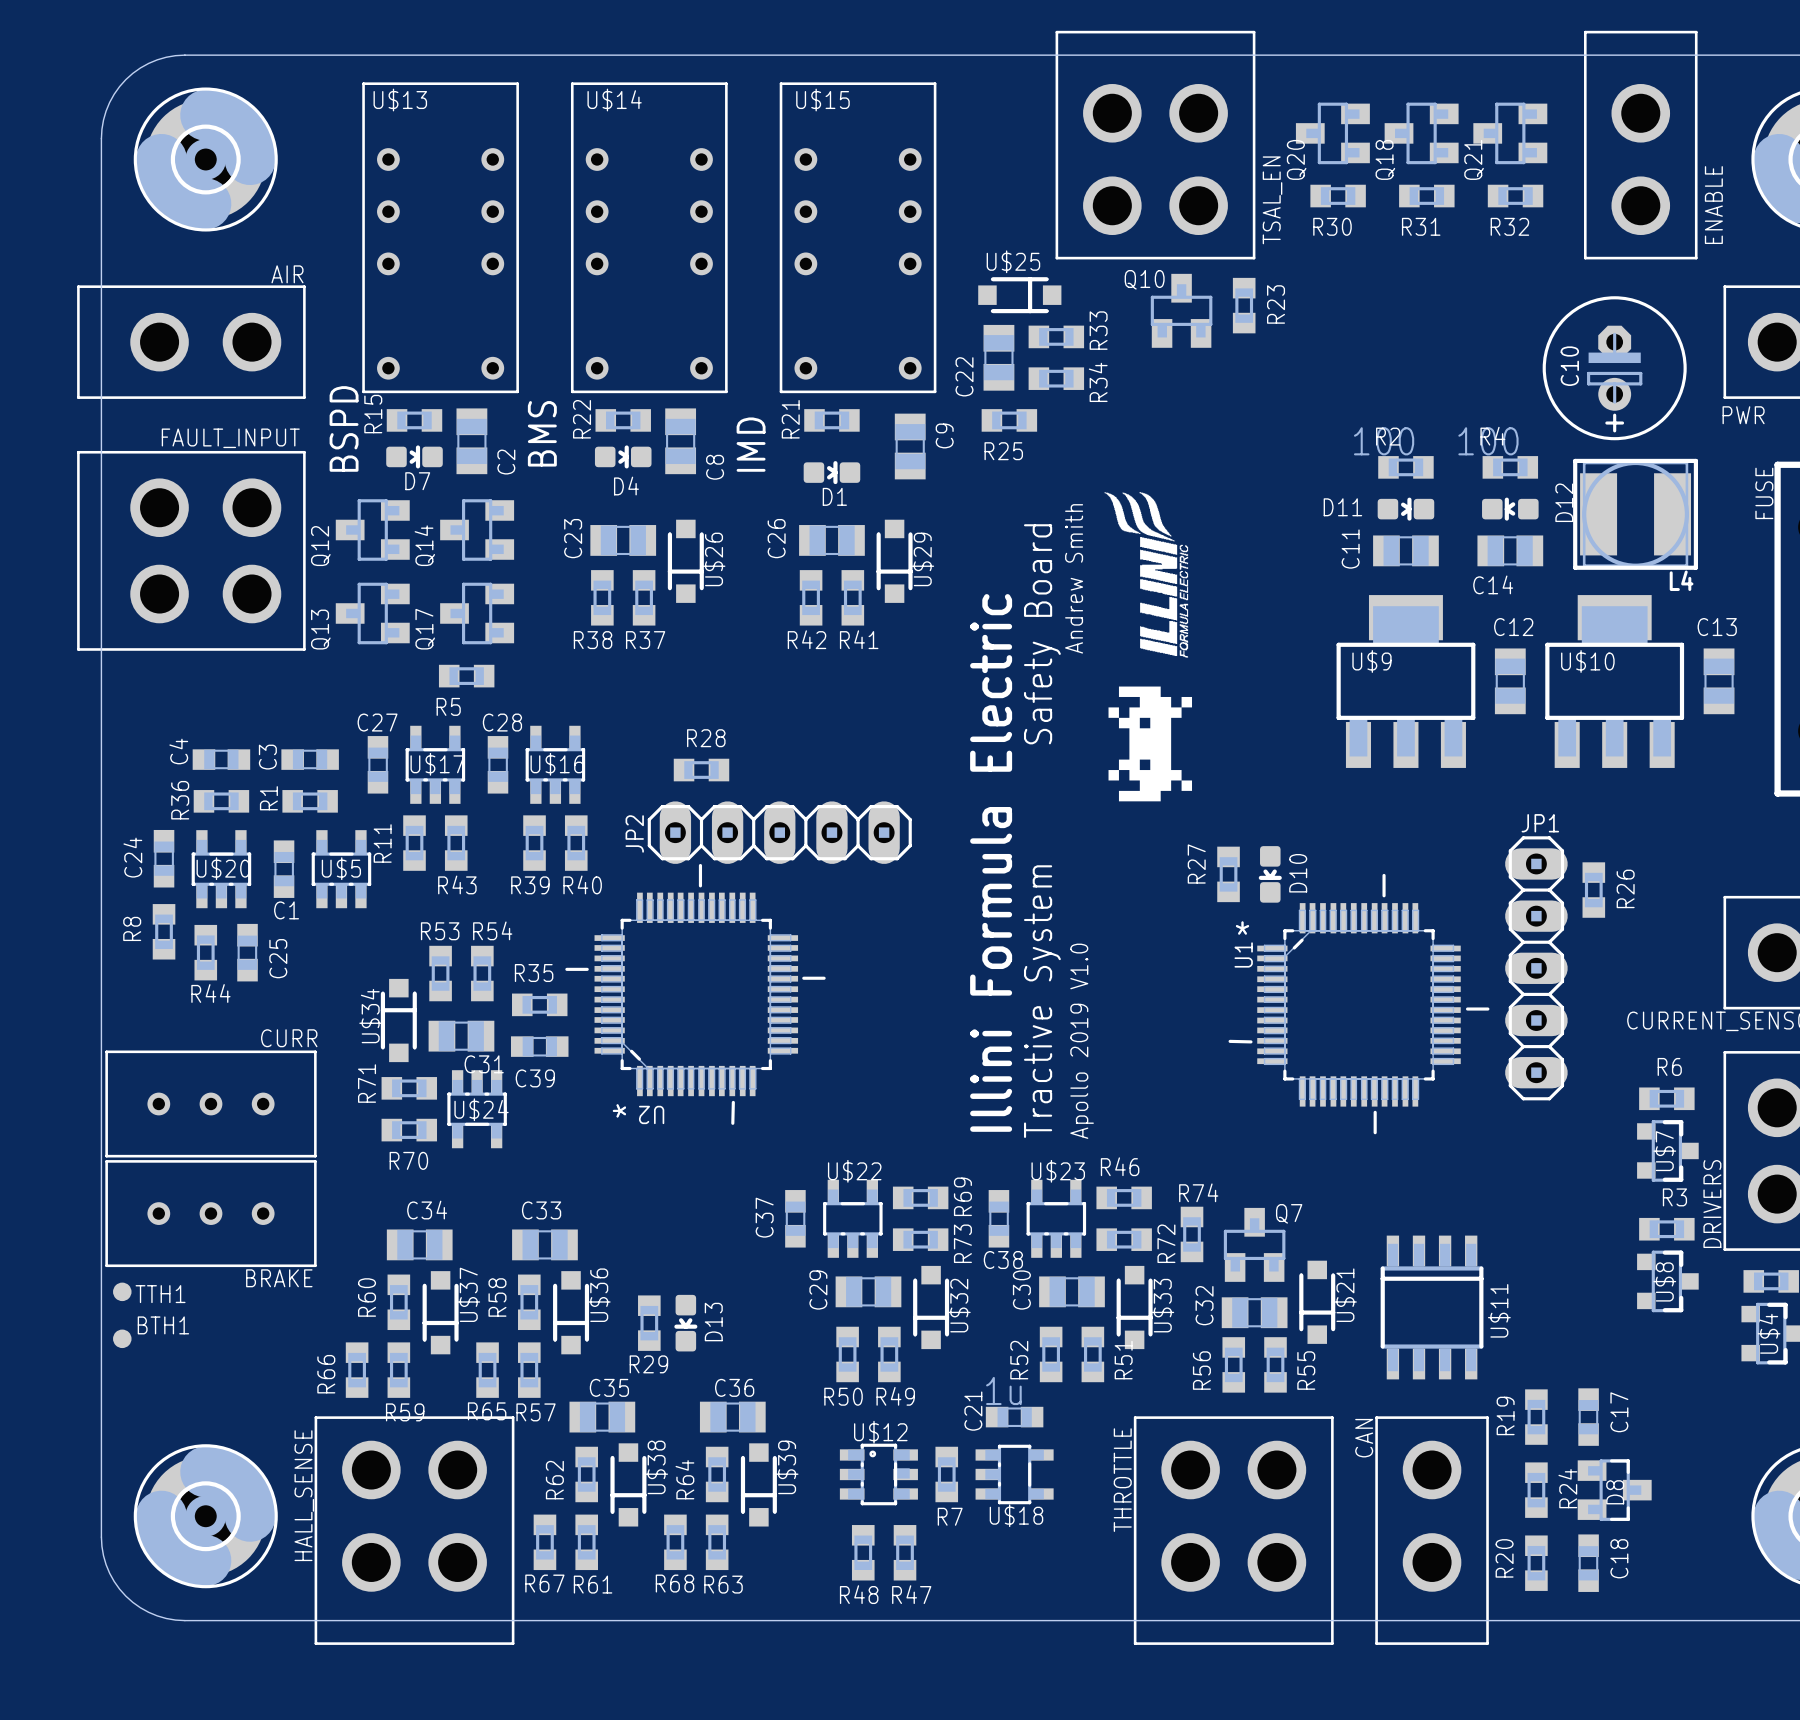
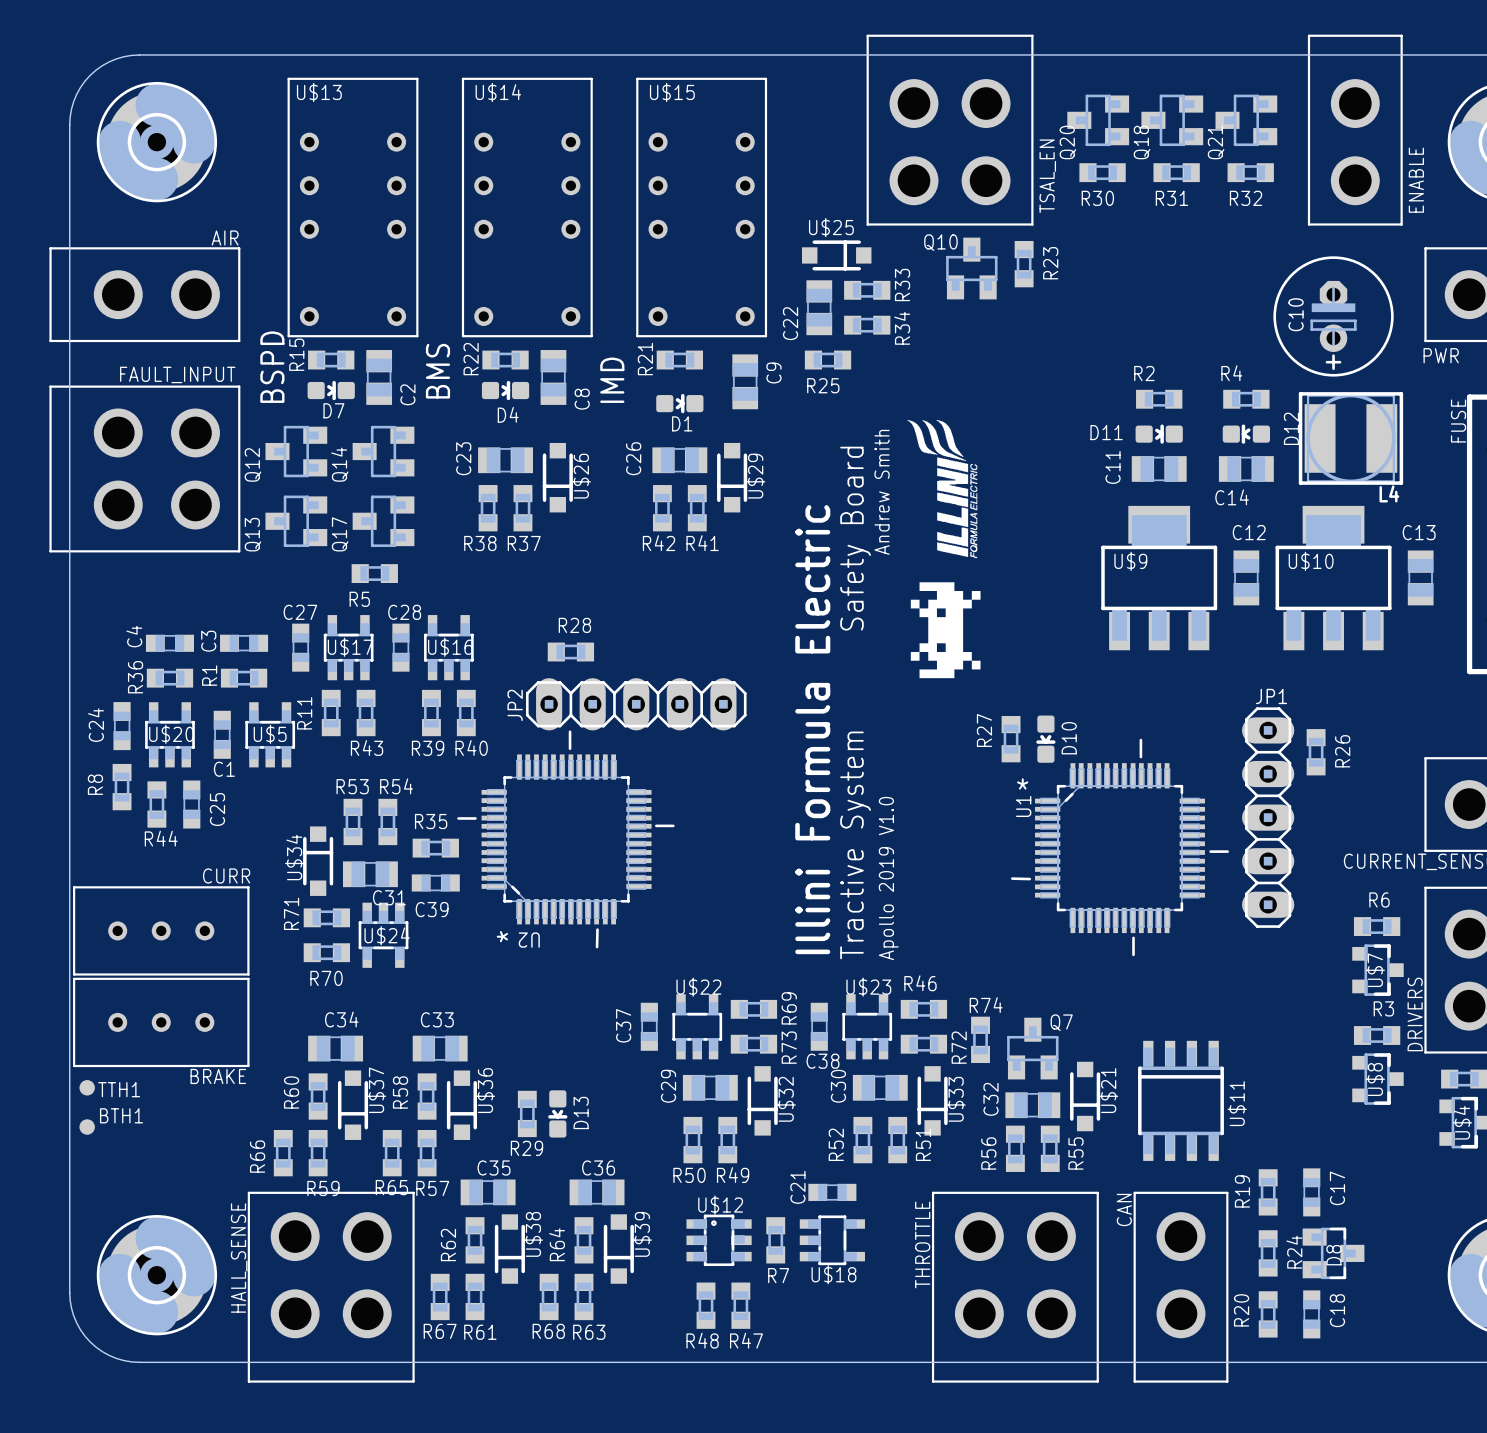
R2 value: 100 (1384, 441) -> none
R4 value: 100 (1488, 441) -> none
C21 value: 1u (1003, 1390) -> none

